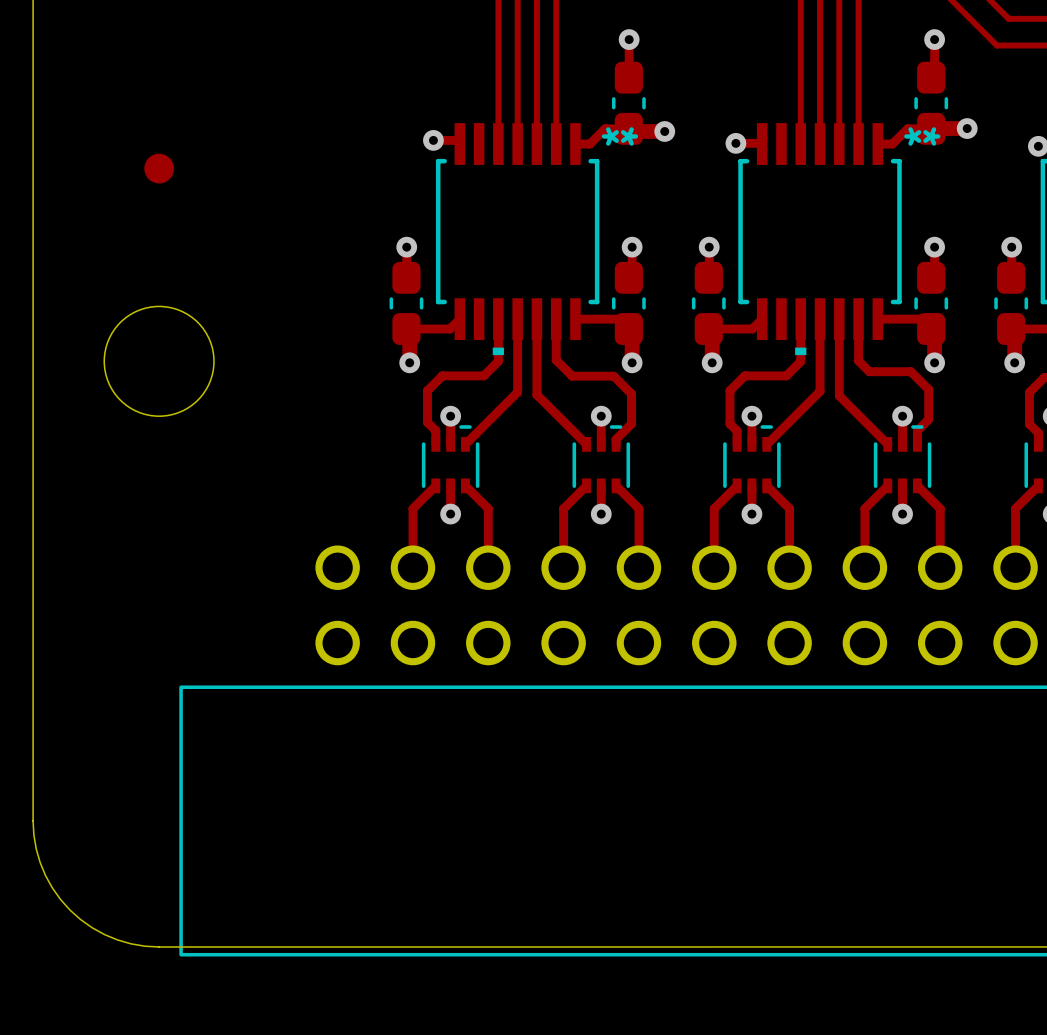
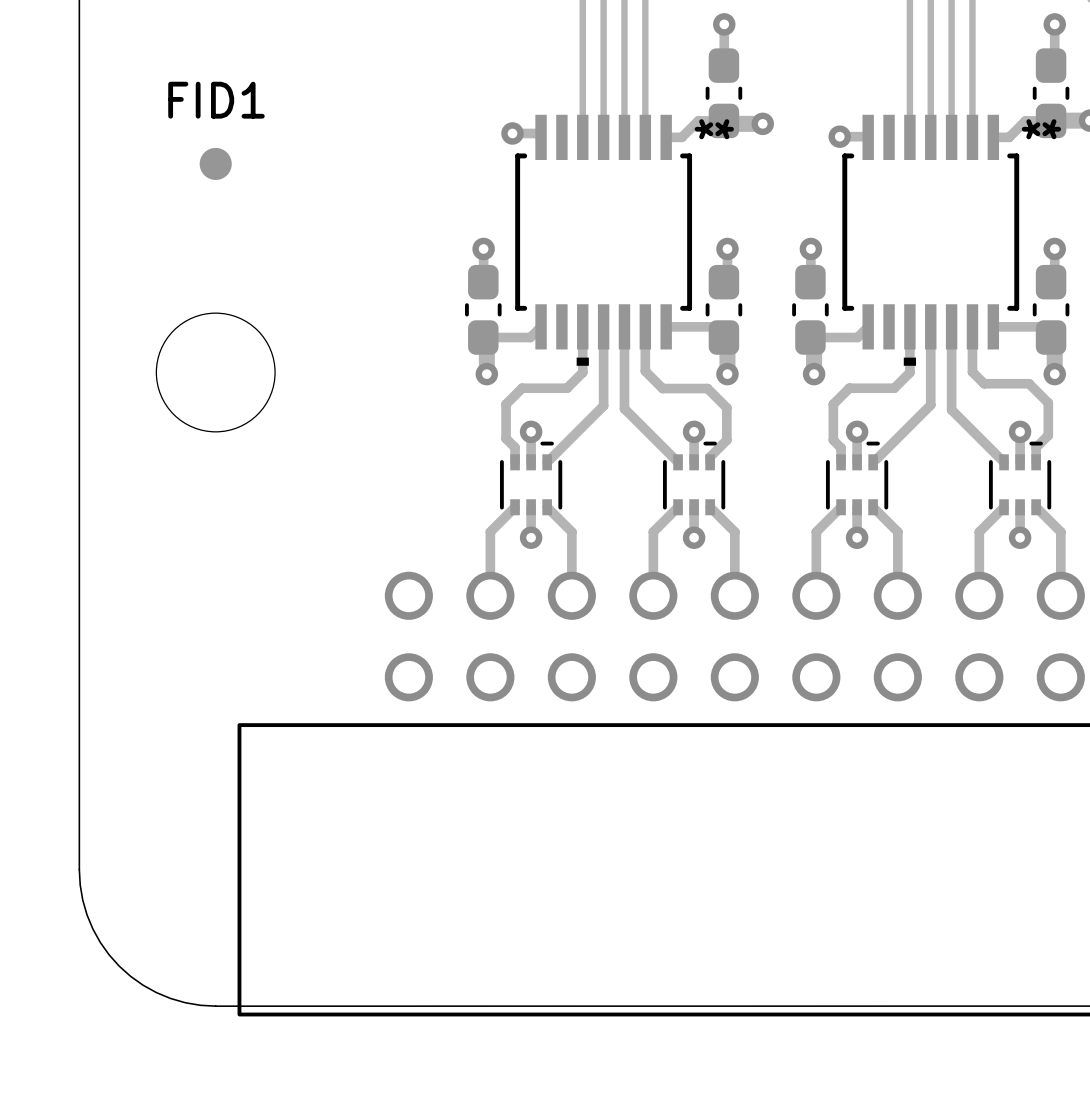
FID1 name: none -> FID1 (216, 100)

